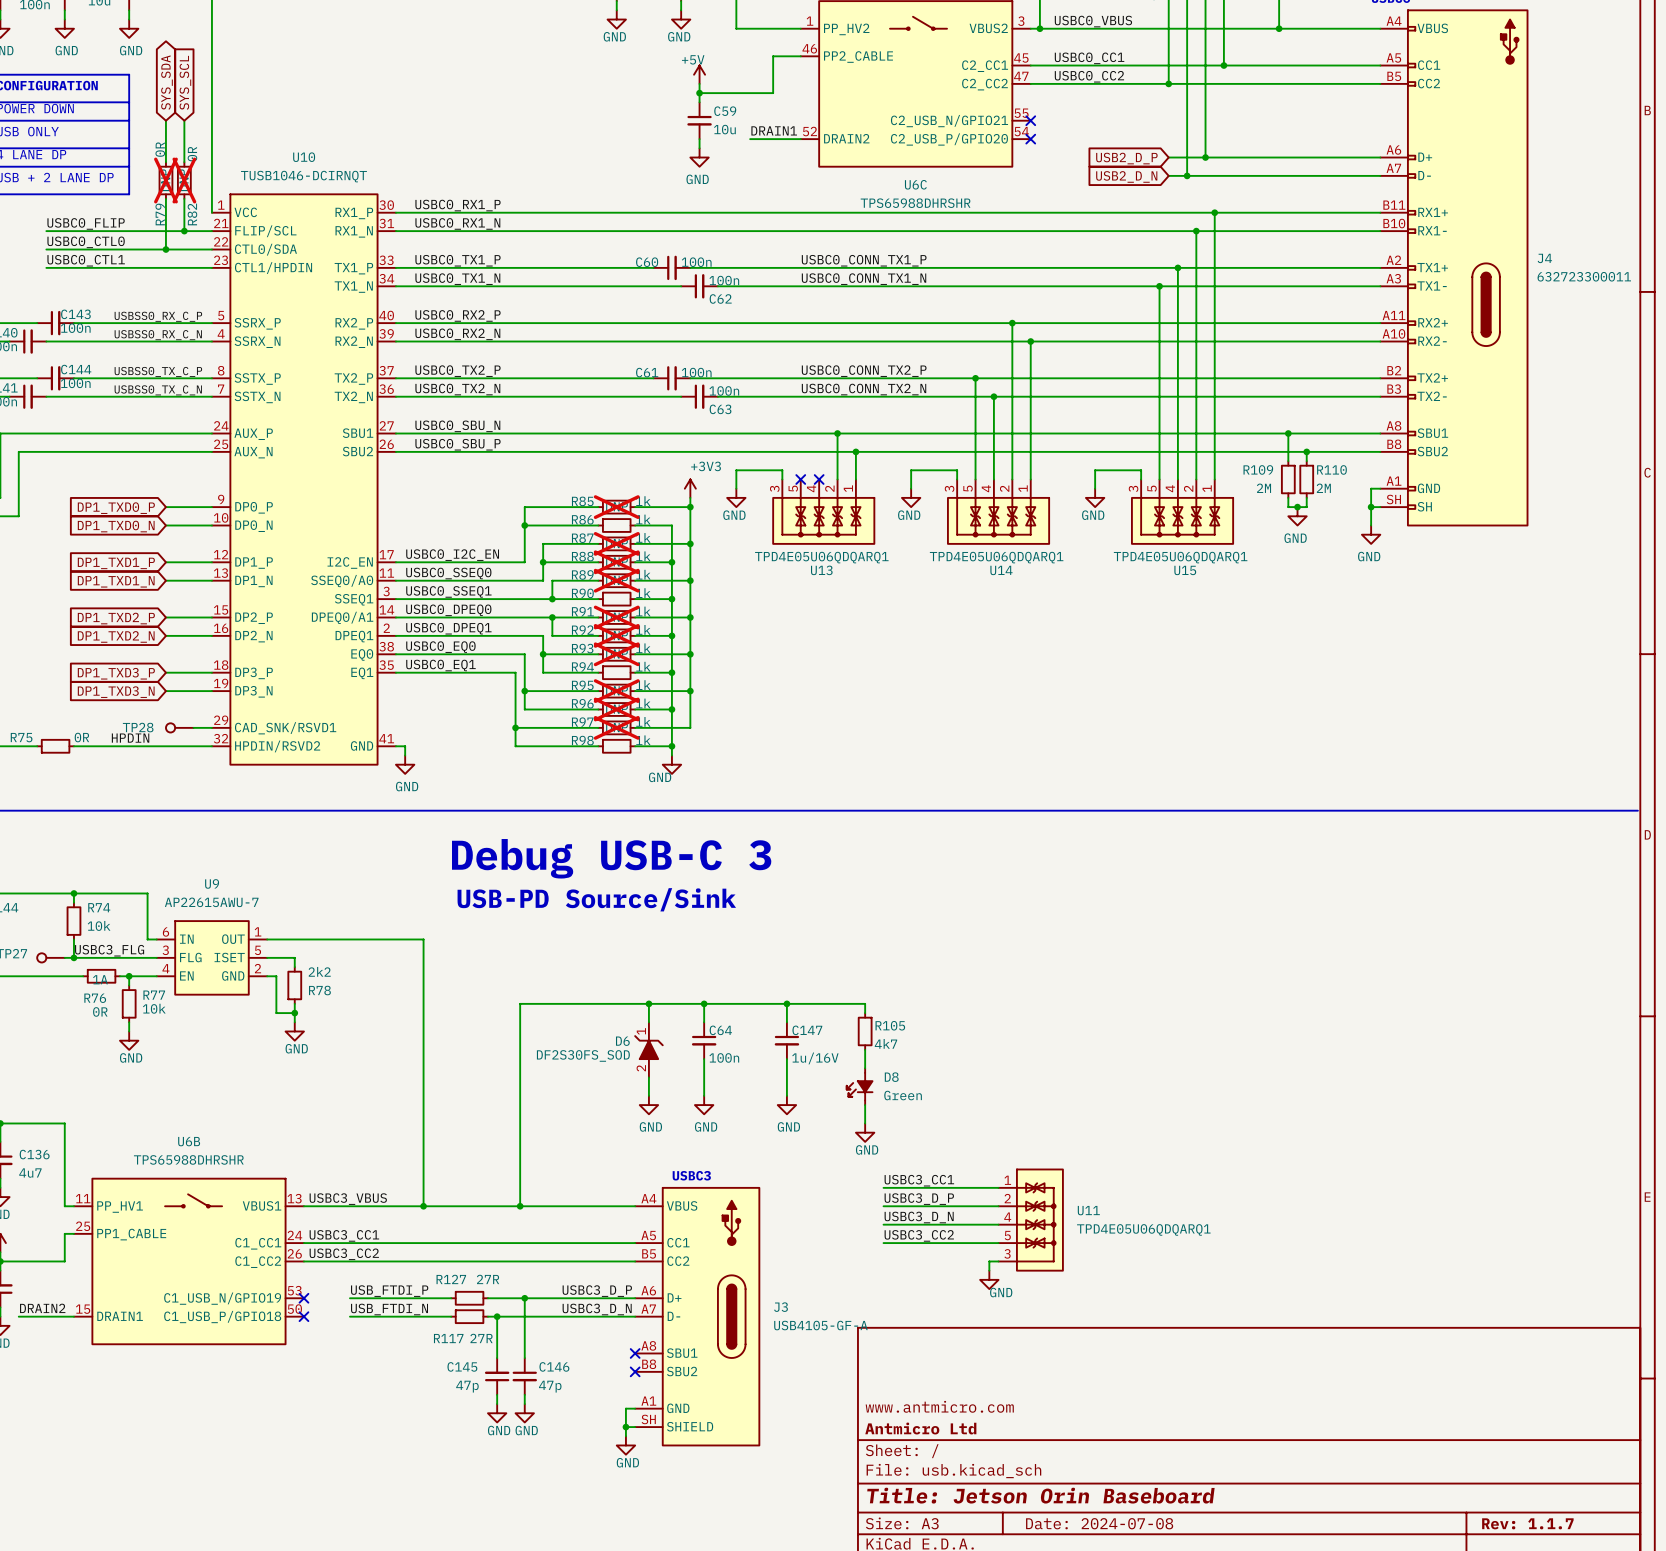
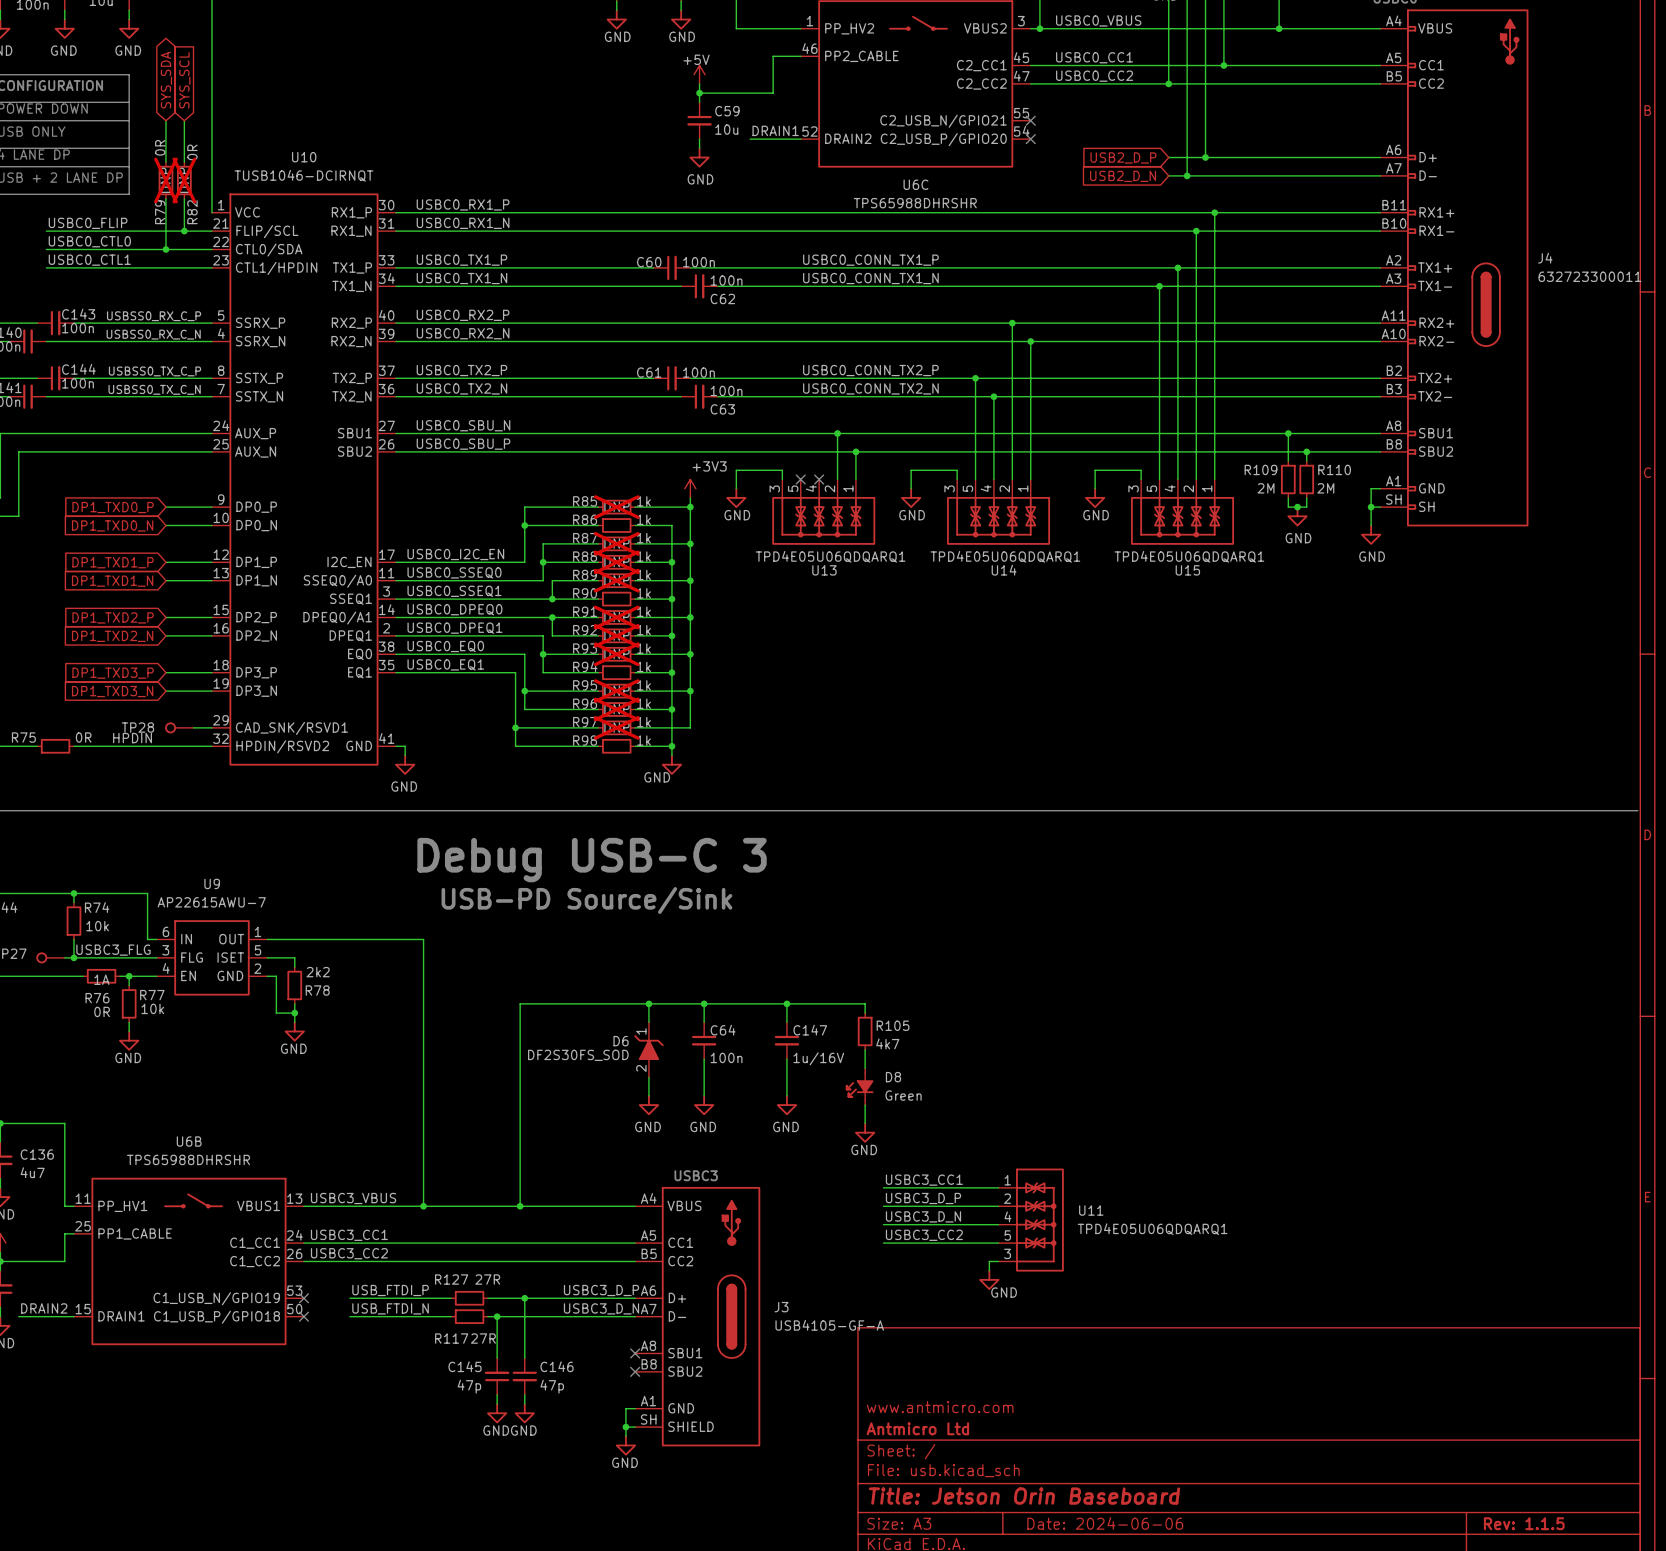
title block: Date: 2024-07-08 (1099, 1523) -> Date: 2024-06-06 (1105, 1523)
title block: Rev: 1.1.7 (1527, 1523) -> Rev: 1.1.5 (1524, 1523)

